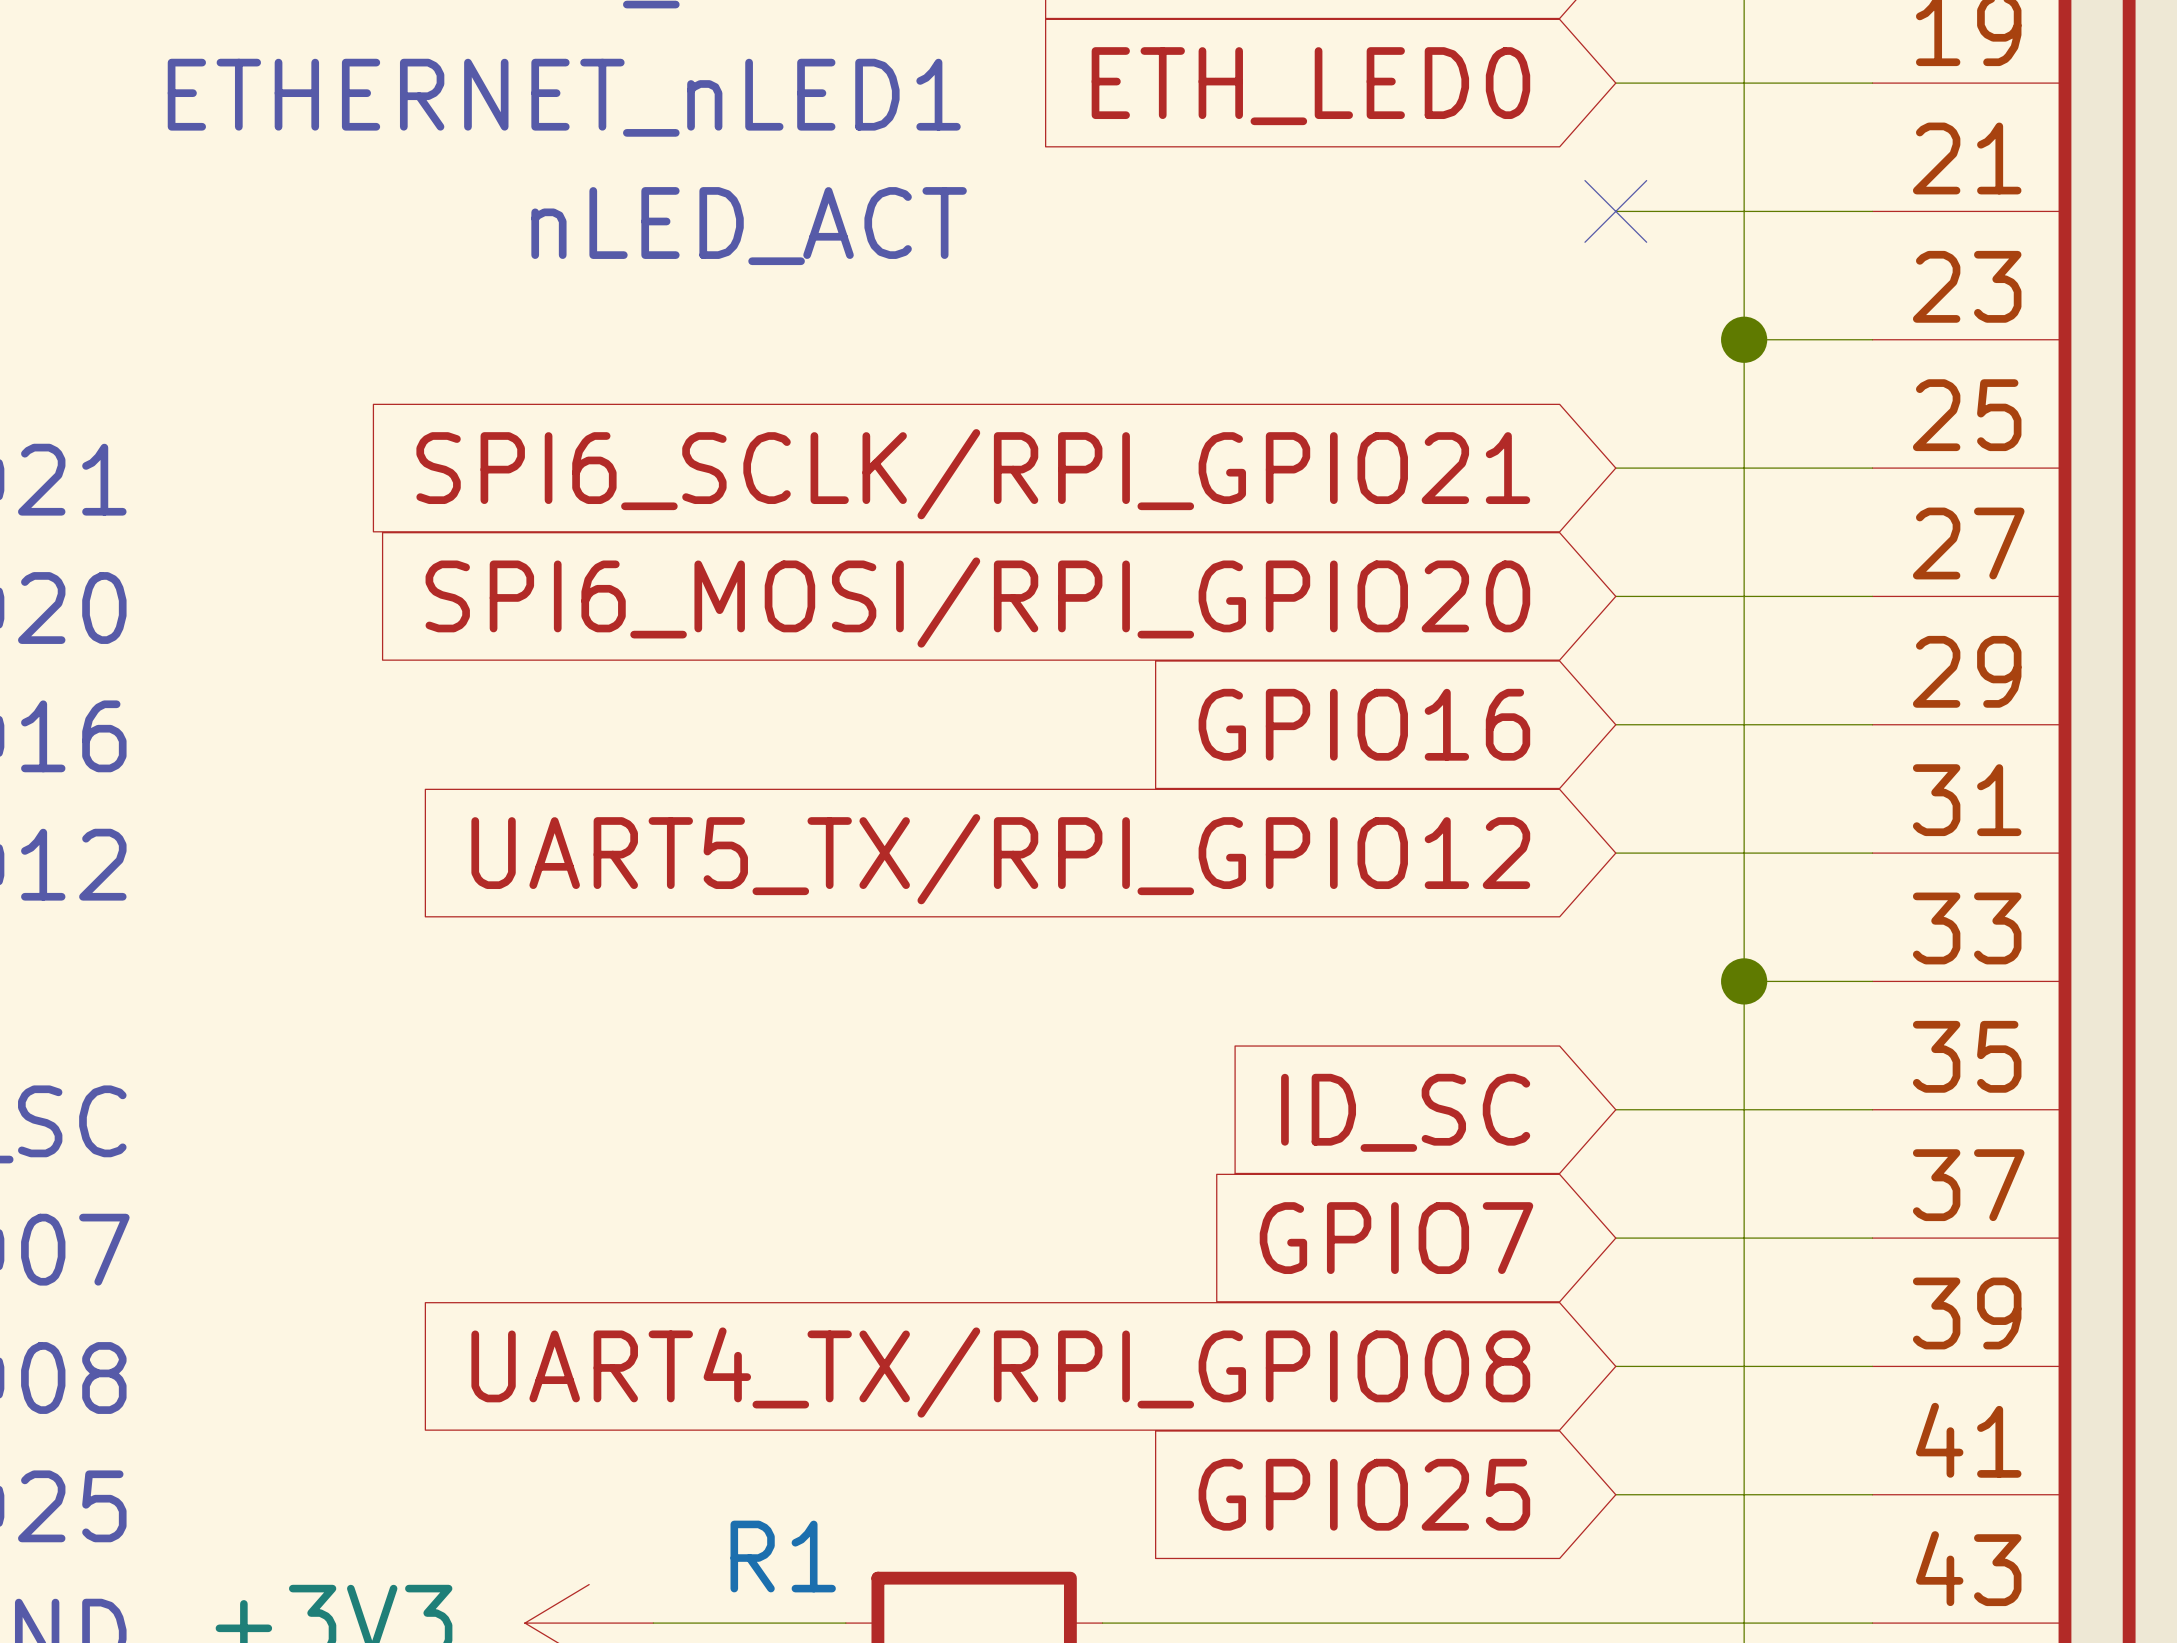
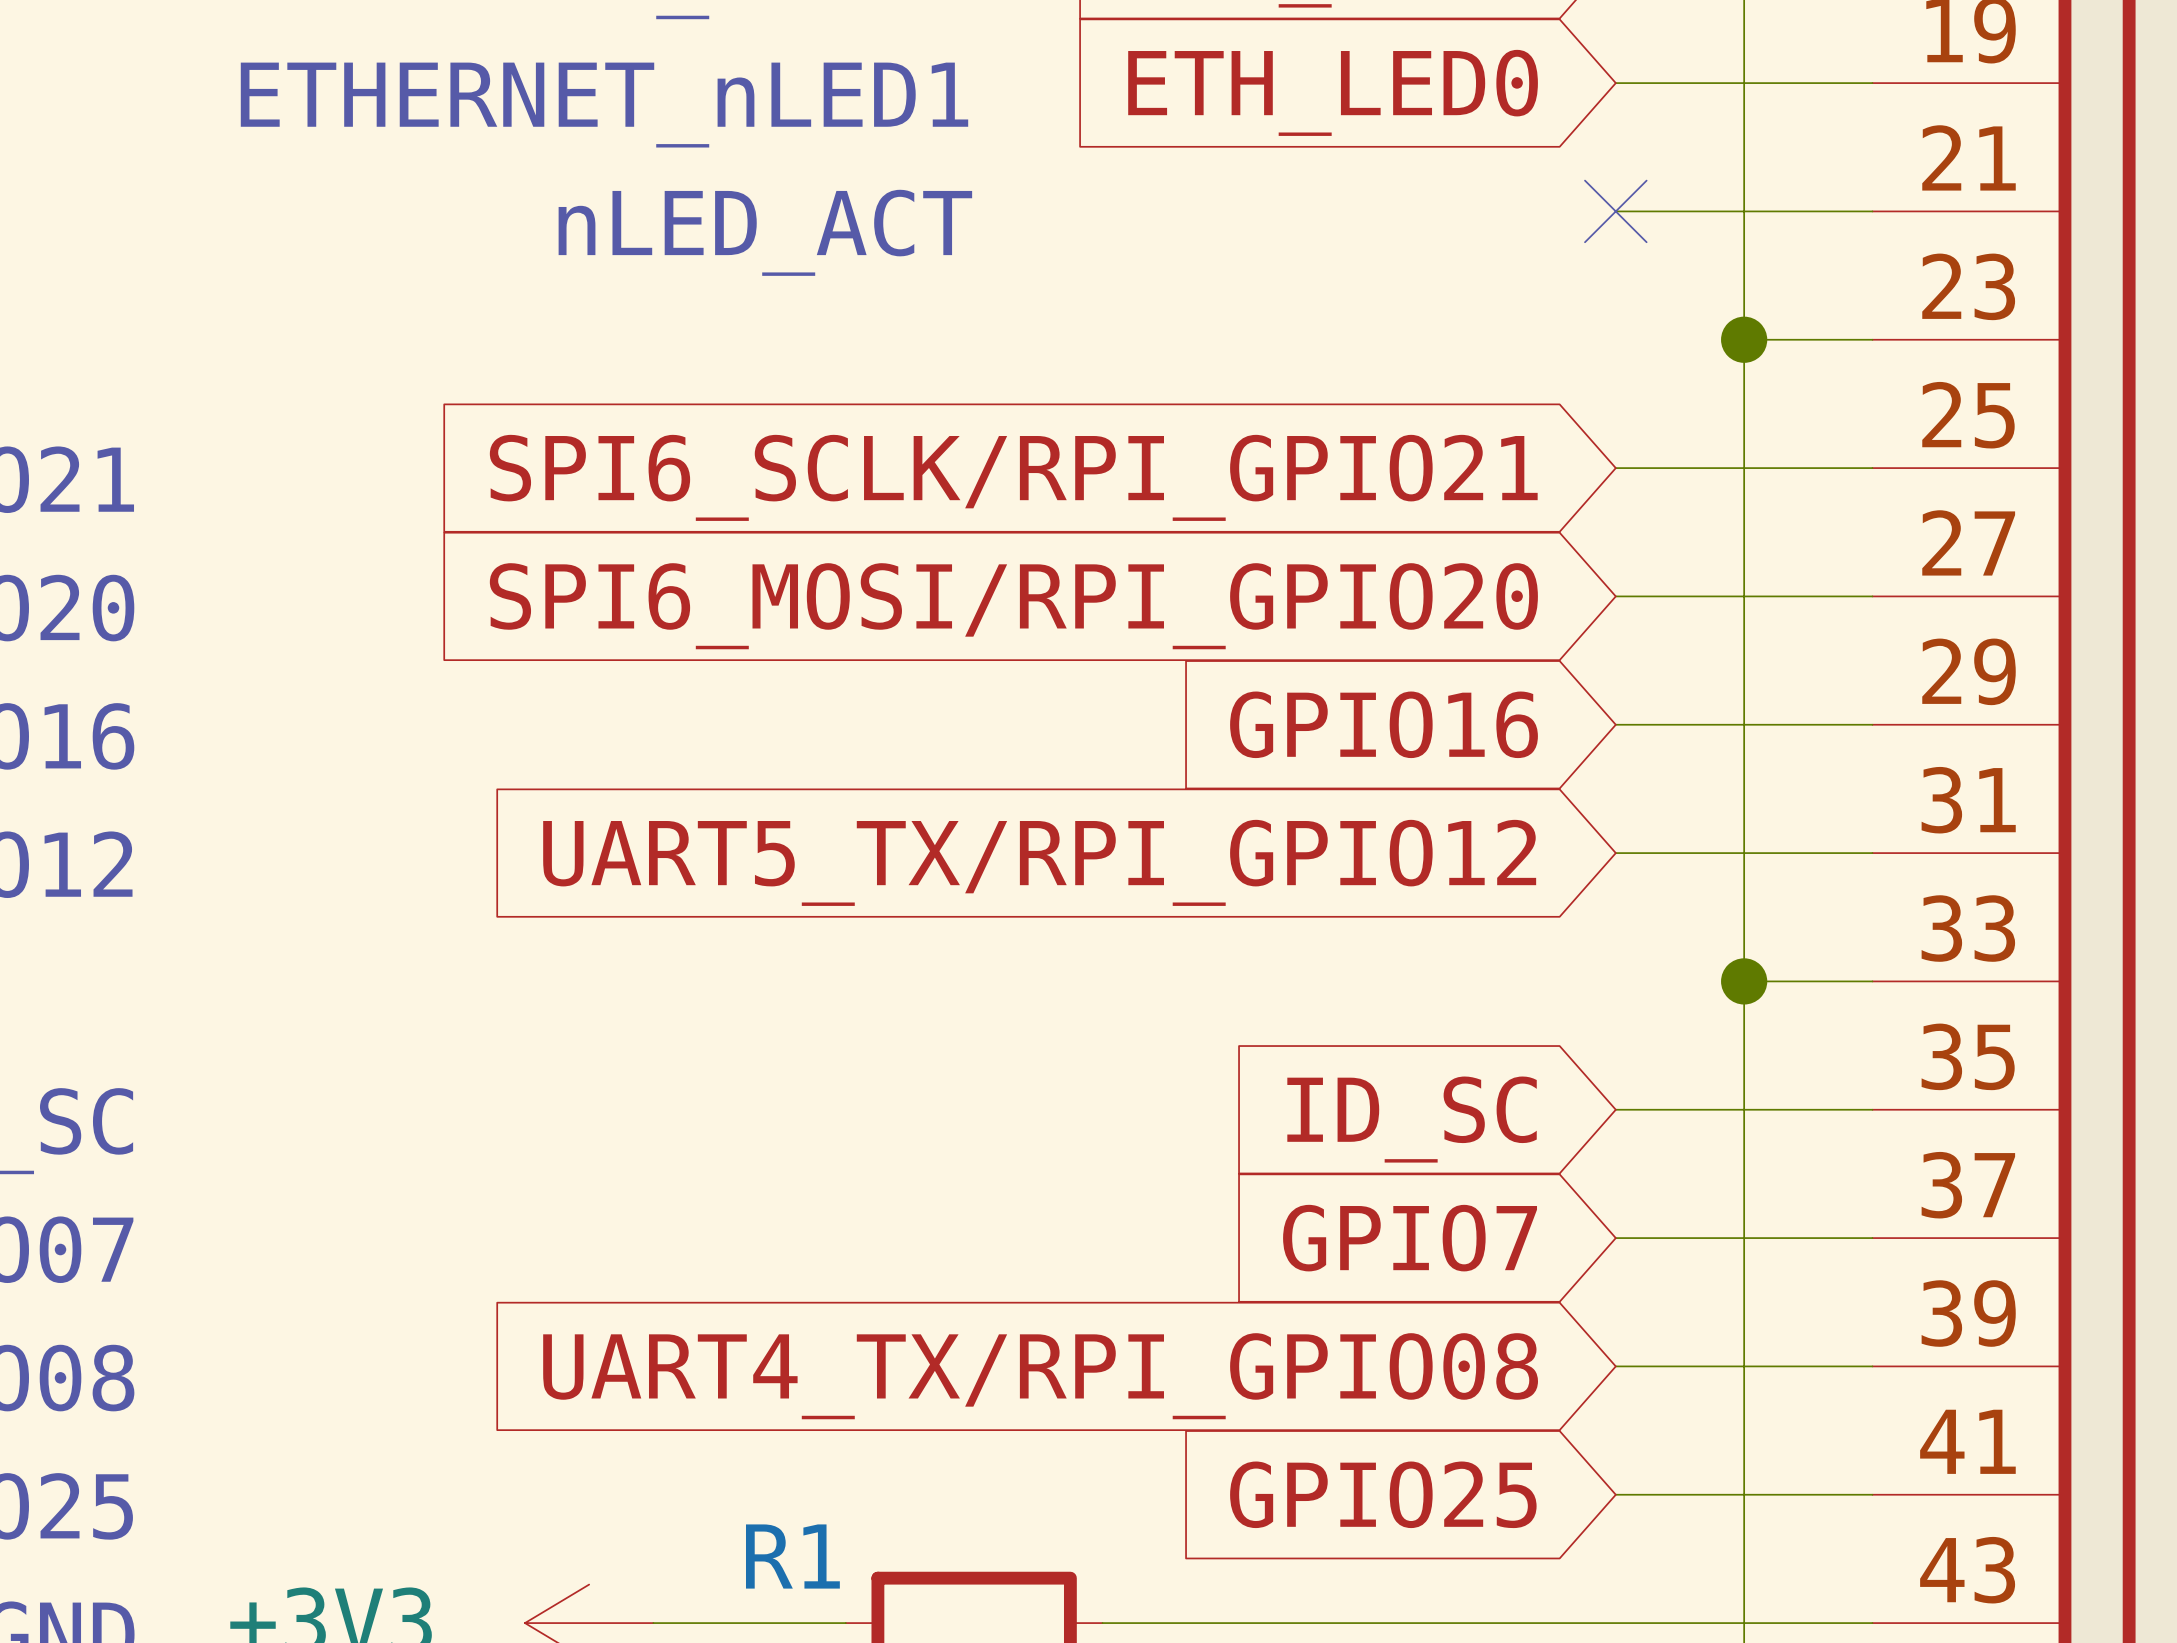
R1 name position: R1 (783, 1556) -> R1 (792, 1556)

